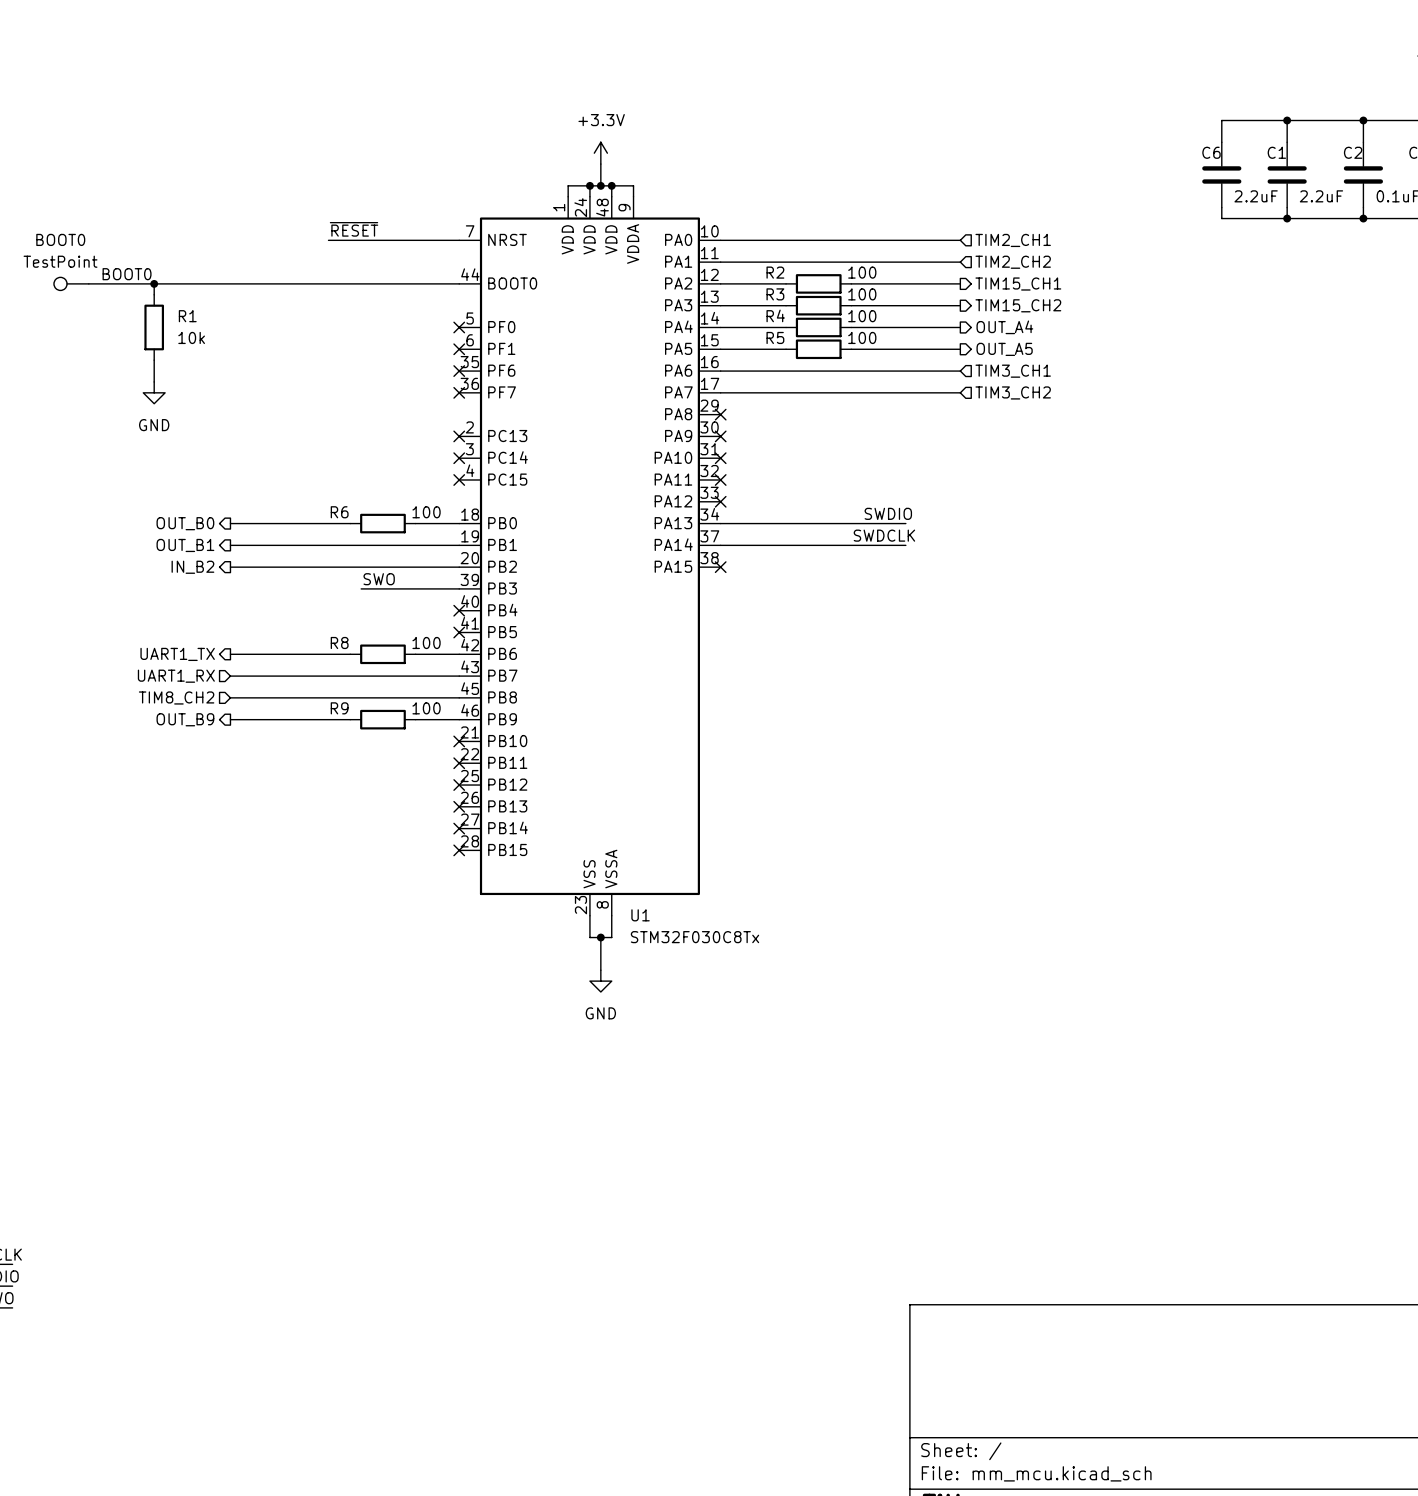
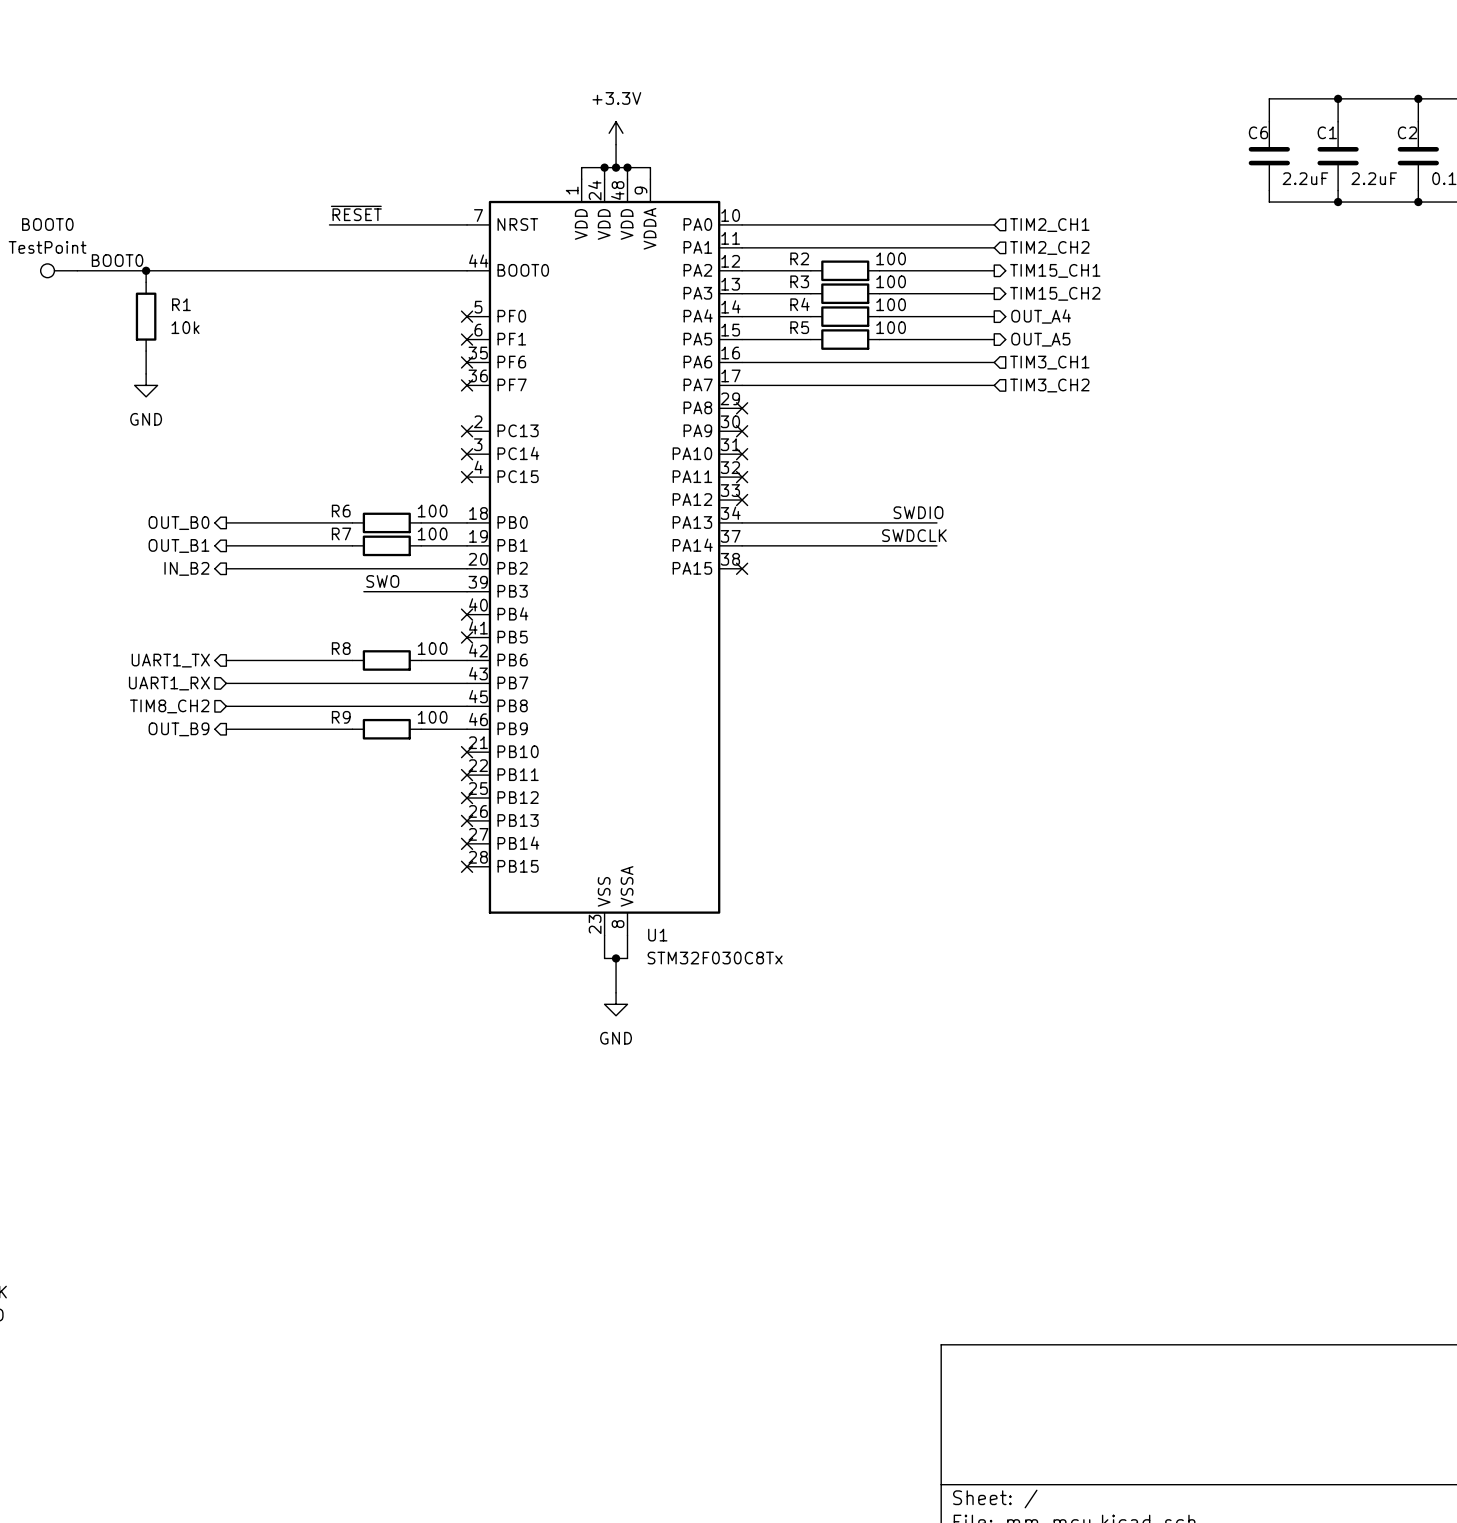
wire: (350, 545) (415, 545) -> none
R7: none -> 100 (386, 545)

